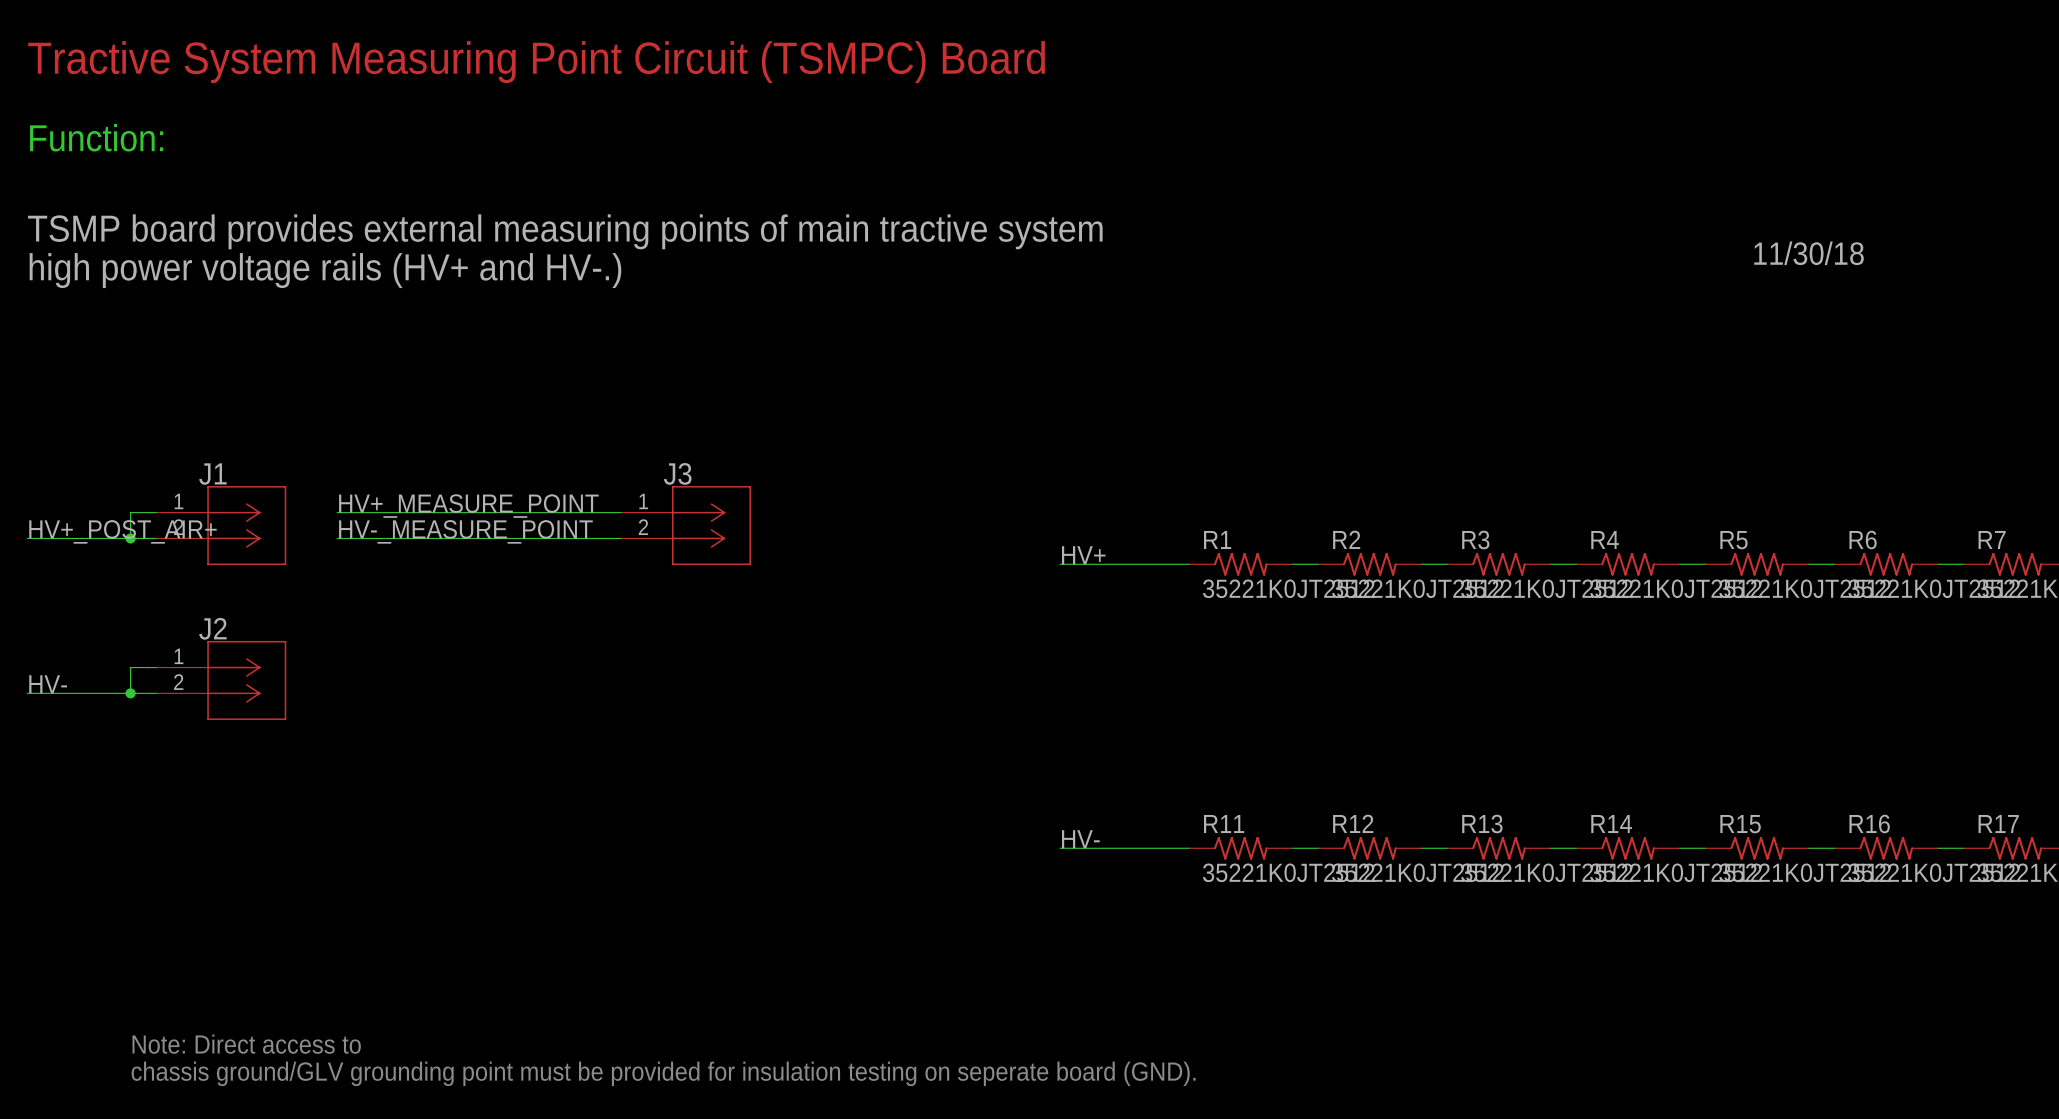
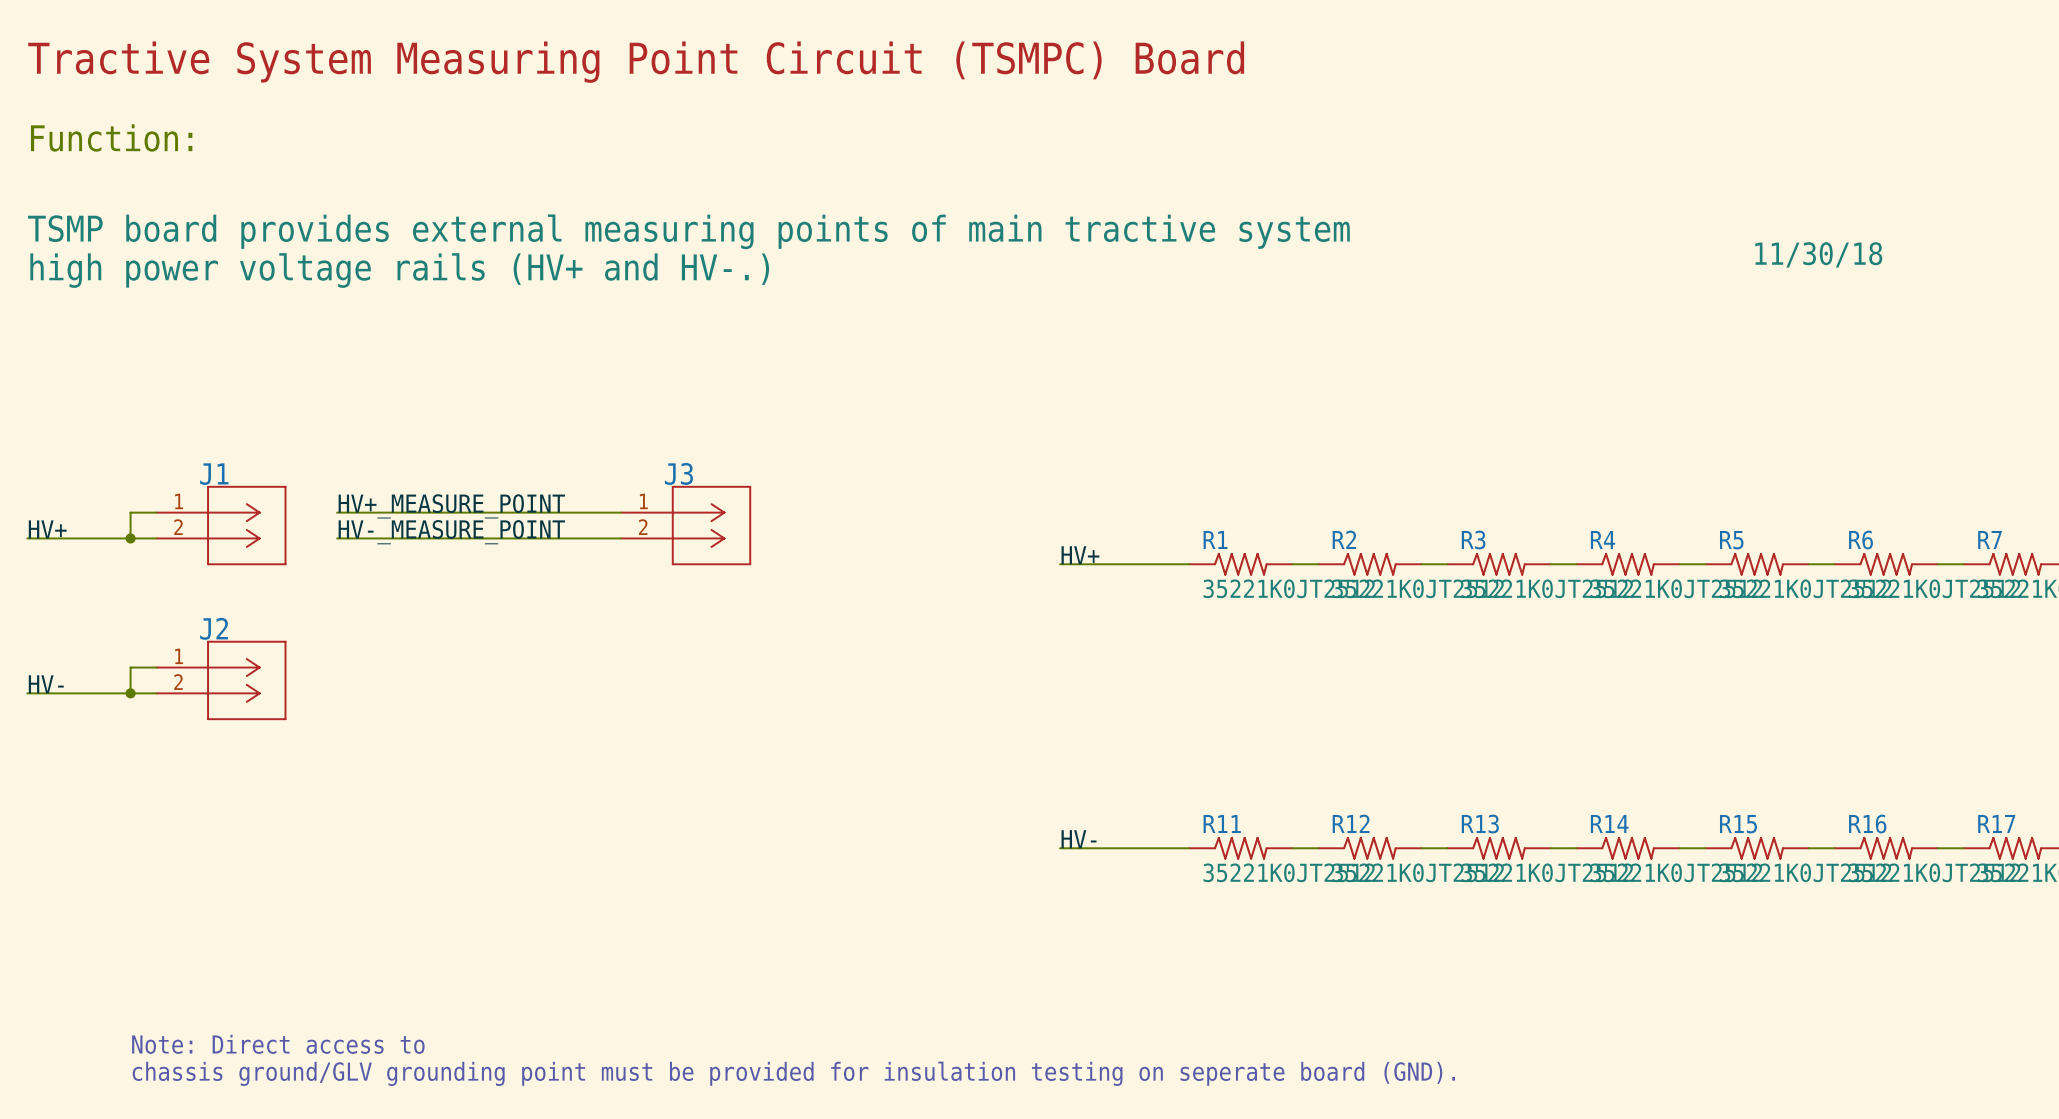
label: HV+_POST_AIR+ (122, 531) -> HV+ (47, 529)

